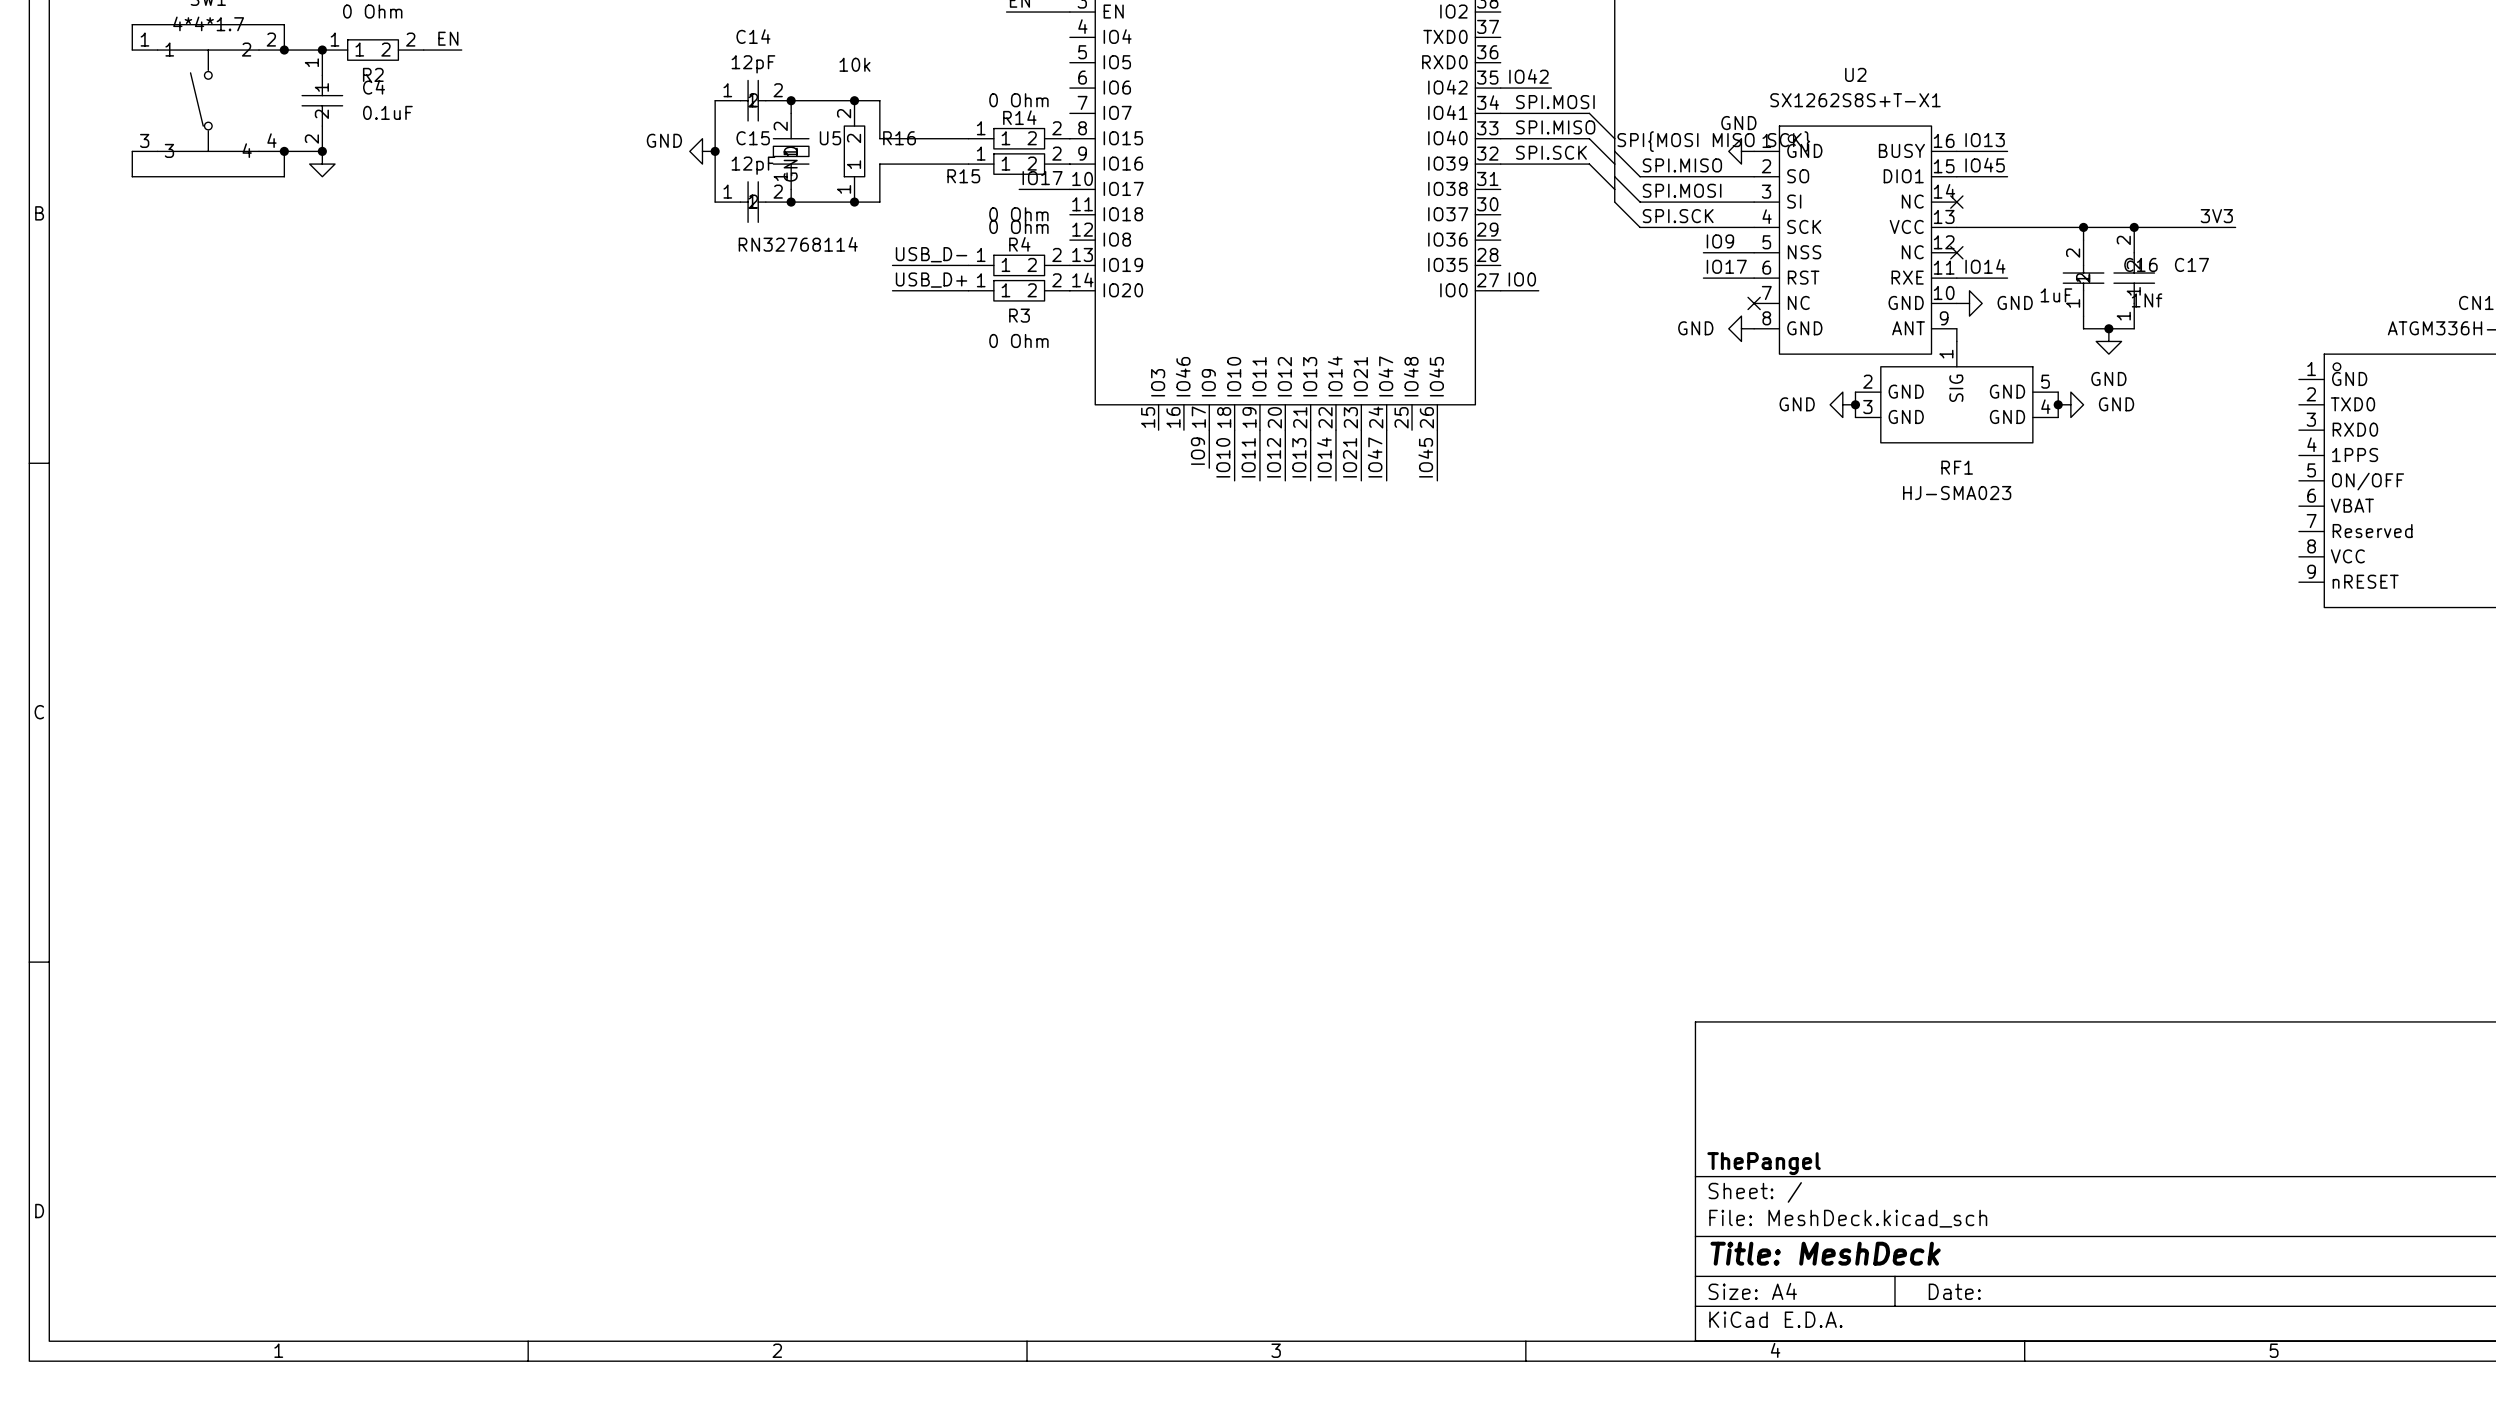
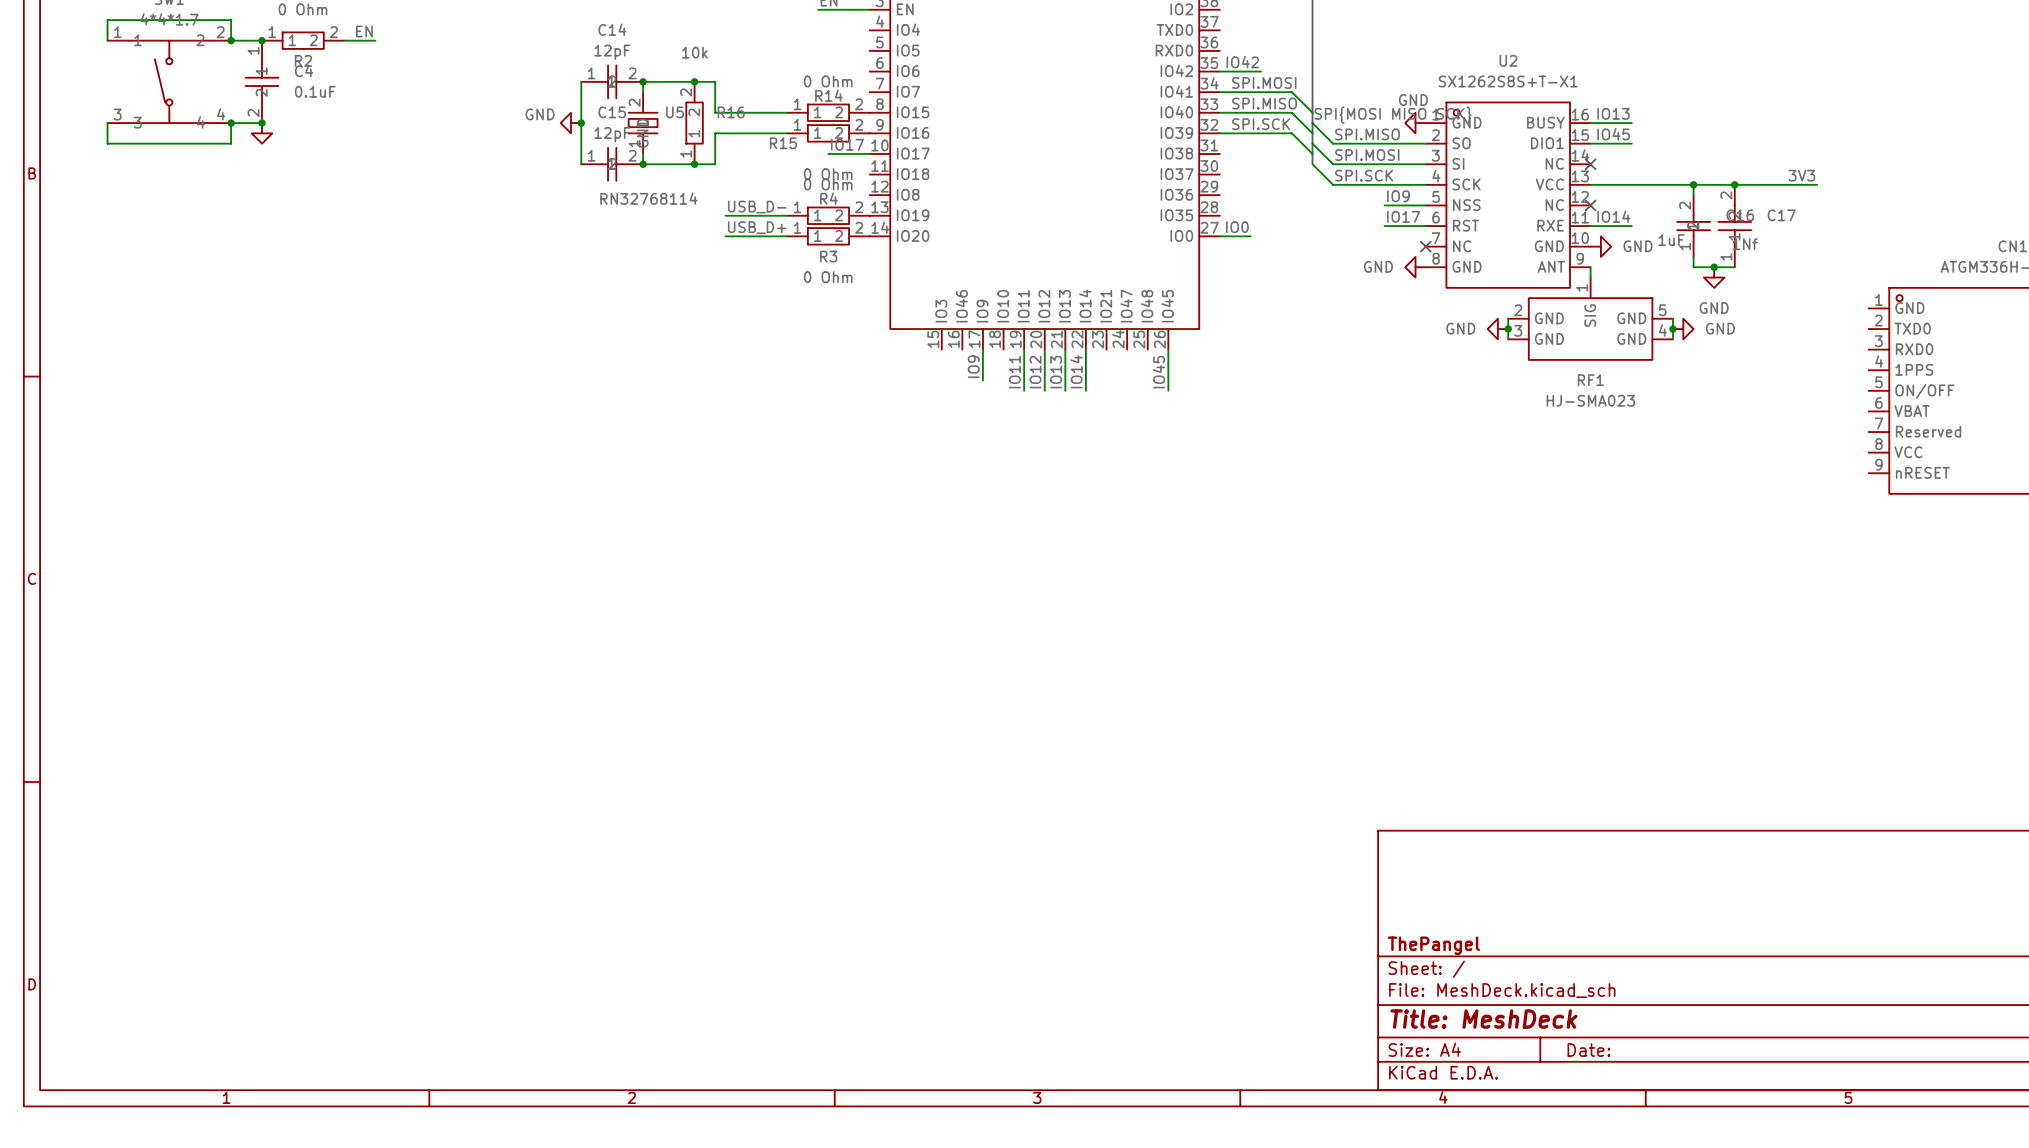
wire: (1234, 430) (1234, 480) -> none
wire: (1361, 430) (1361, 480) -> none
wire: (1386, 430) (1386, 480) -> none
label: IO10 (1223, 457) -> none
label: IO21 (1350, 457) -> none
label: IO47 (1375, 457) -> none

